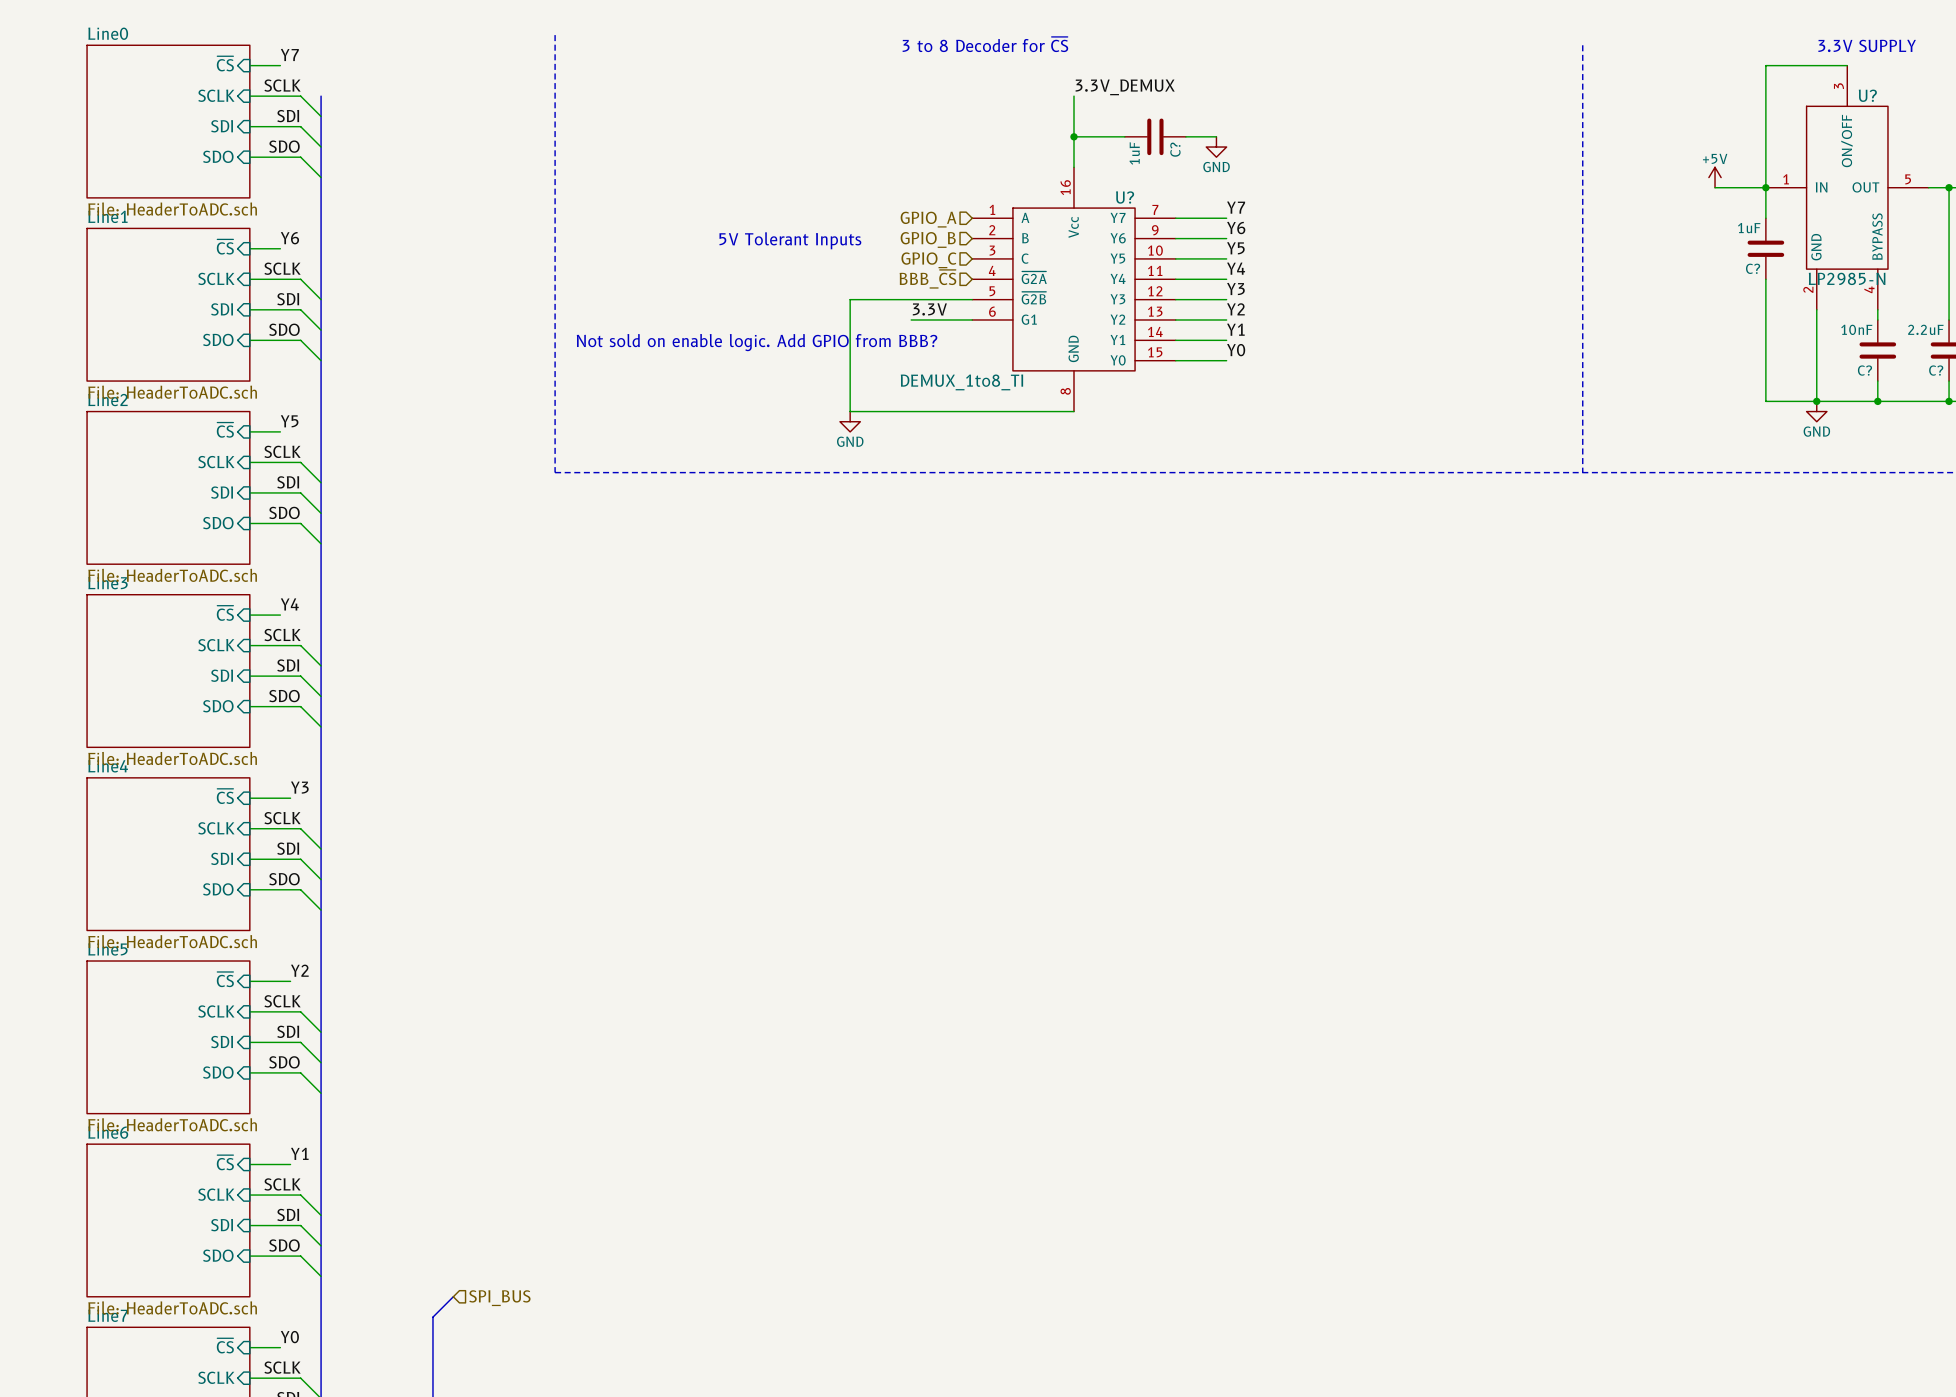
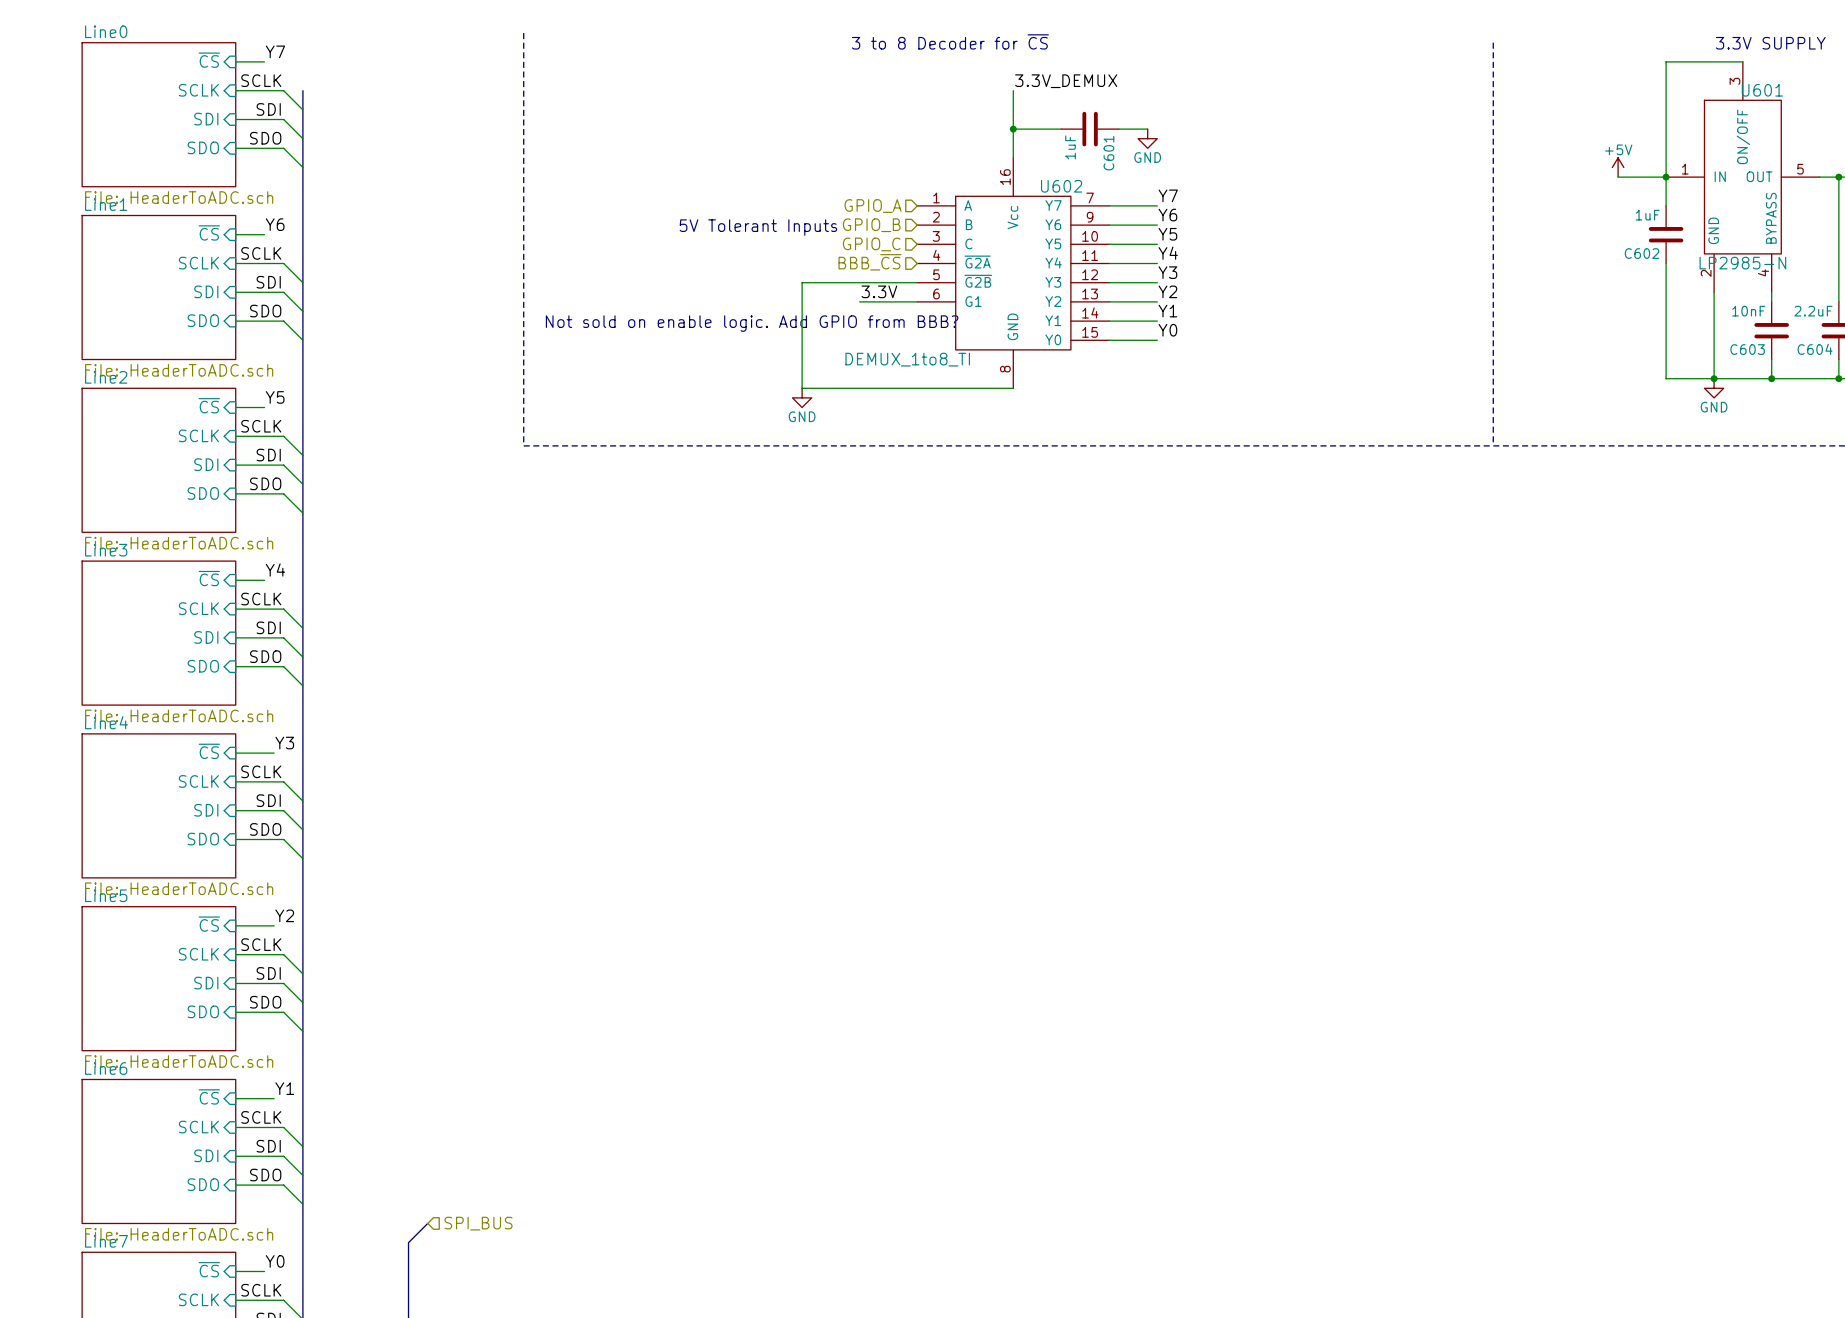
U? name: U? (1867, 95) -> U601 (1762, 90)
C? name: C? (1175, 149) -> C601 (1108, 153)
U? name: U? (1125, 197) -> U602 (1061, 186)
C? name: C? (1753, 268) -> C602 (1642, 253)
C? name: C? (1864, 370) -> C603 (1747, 349)
C? name: C? (1936, 370) -> C604 (1815, 349)

